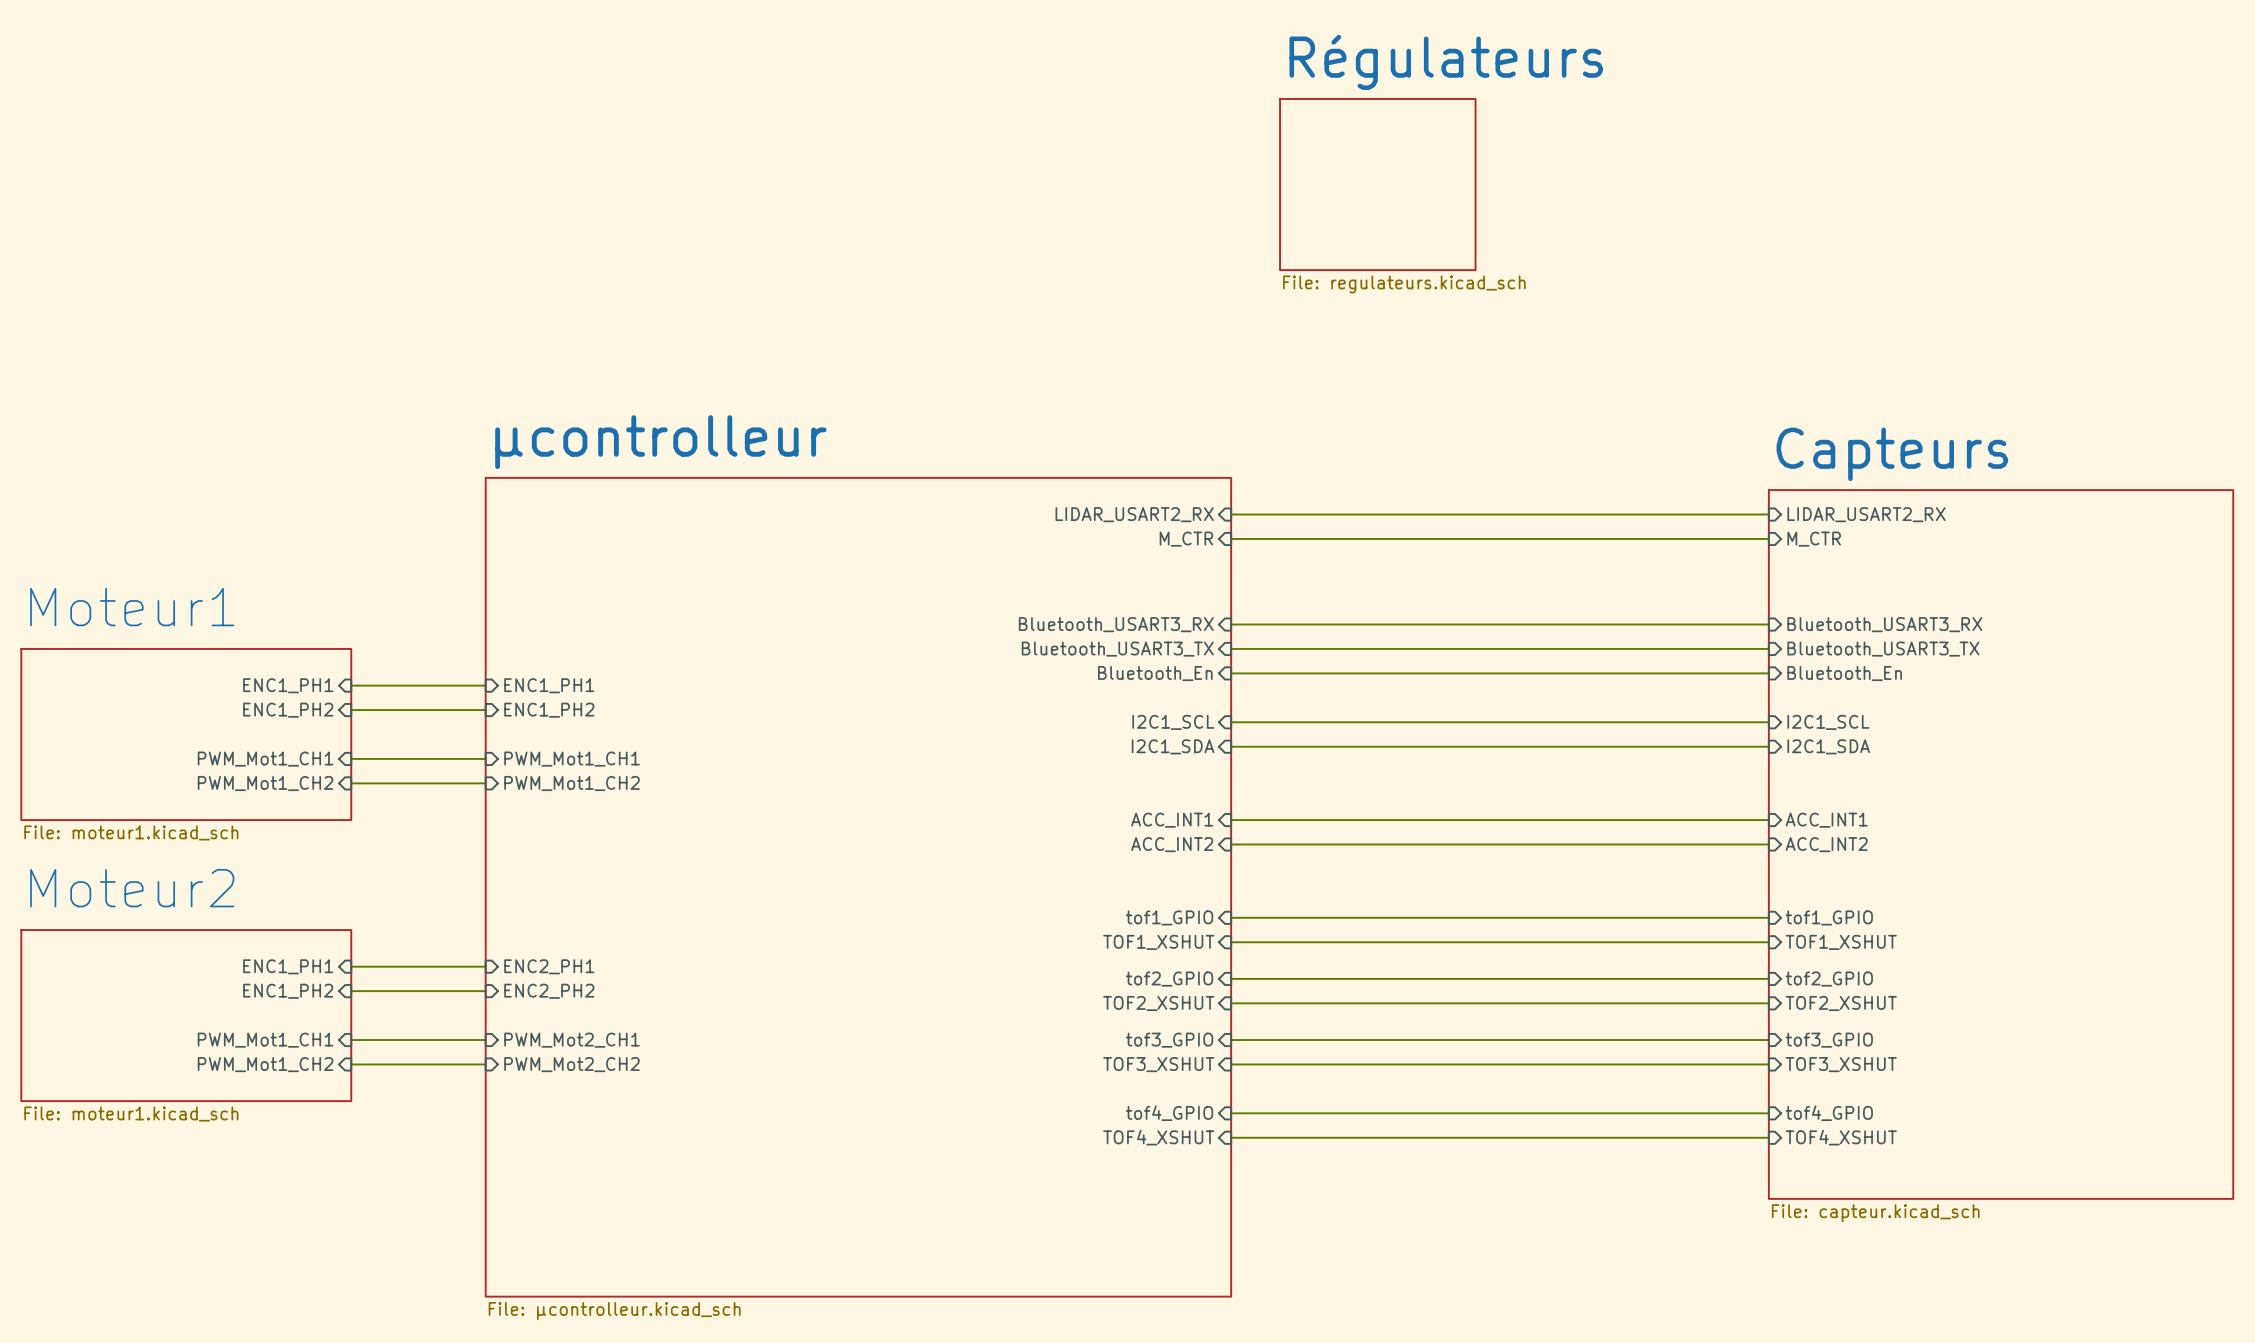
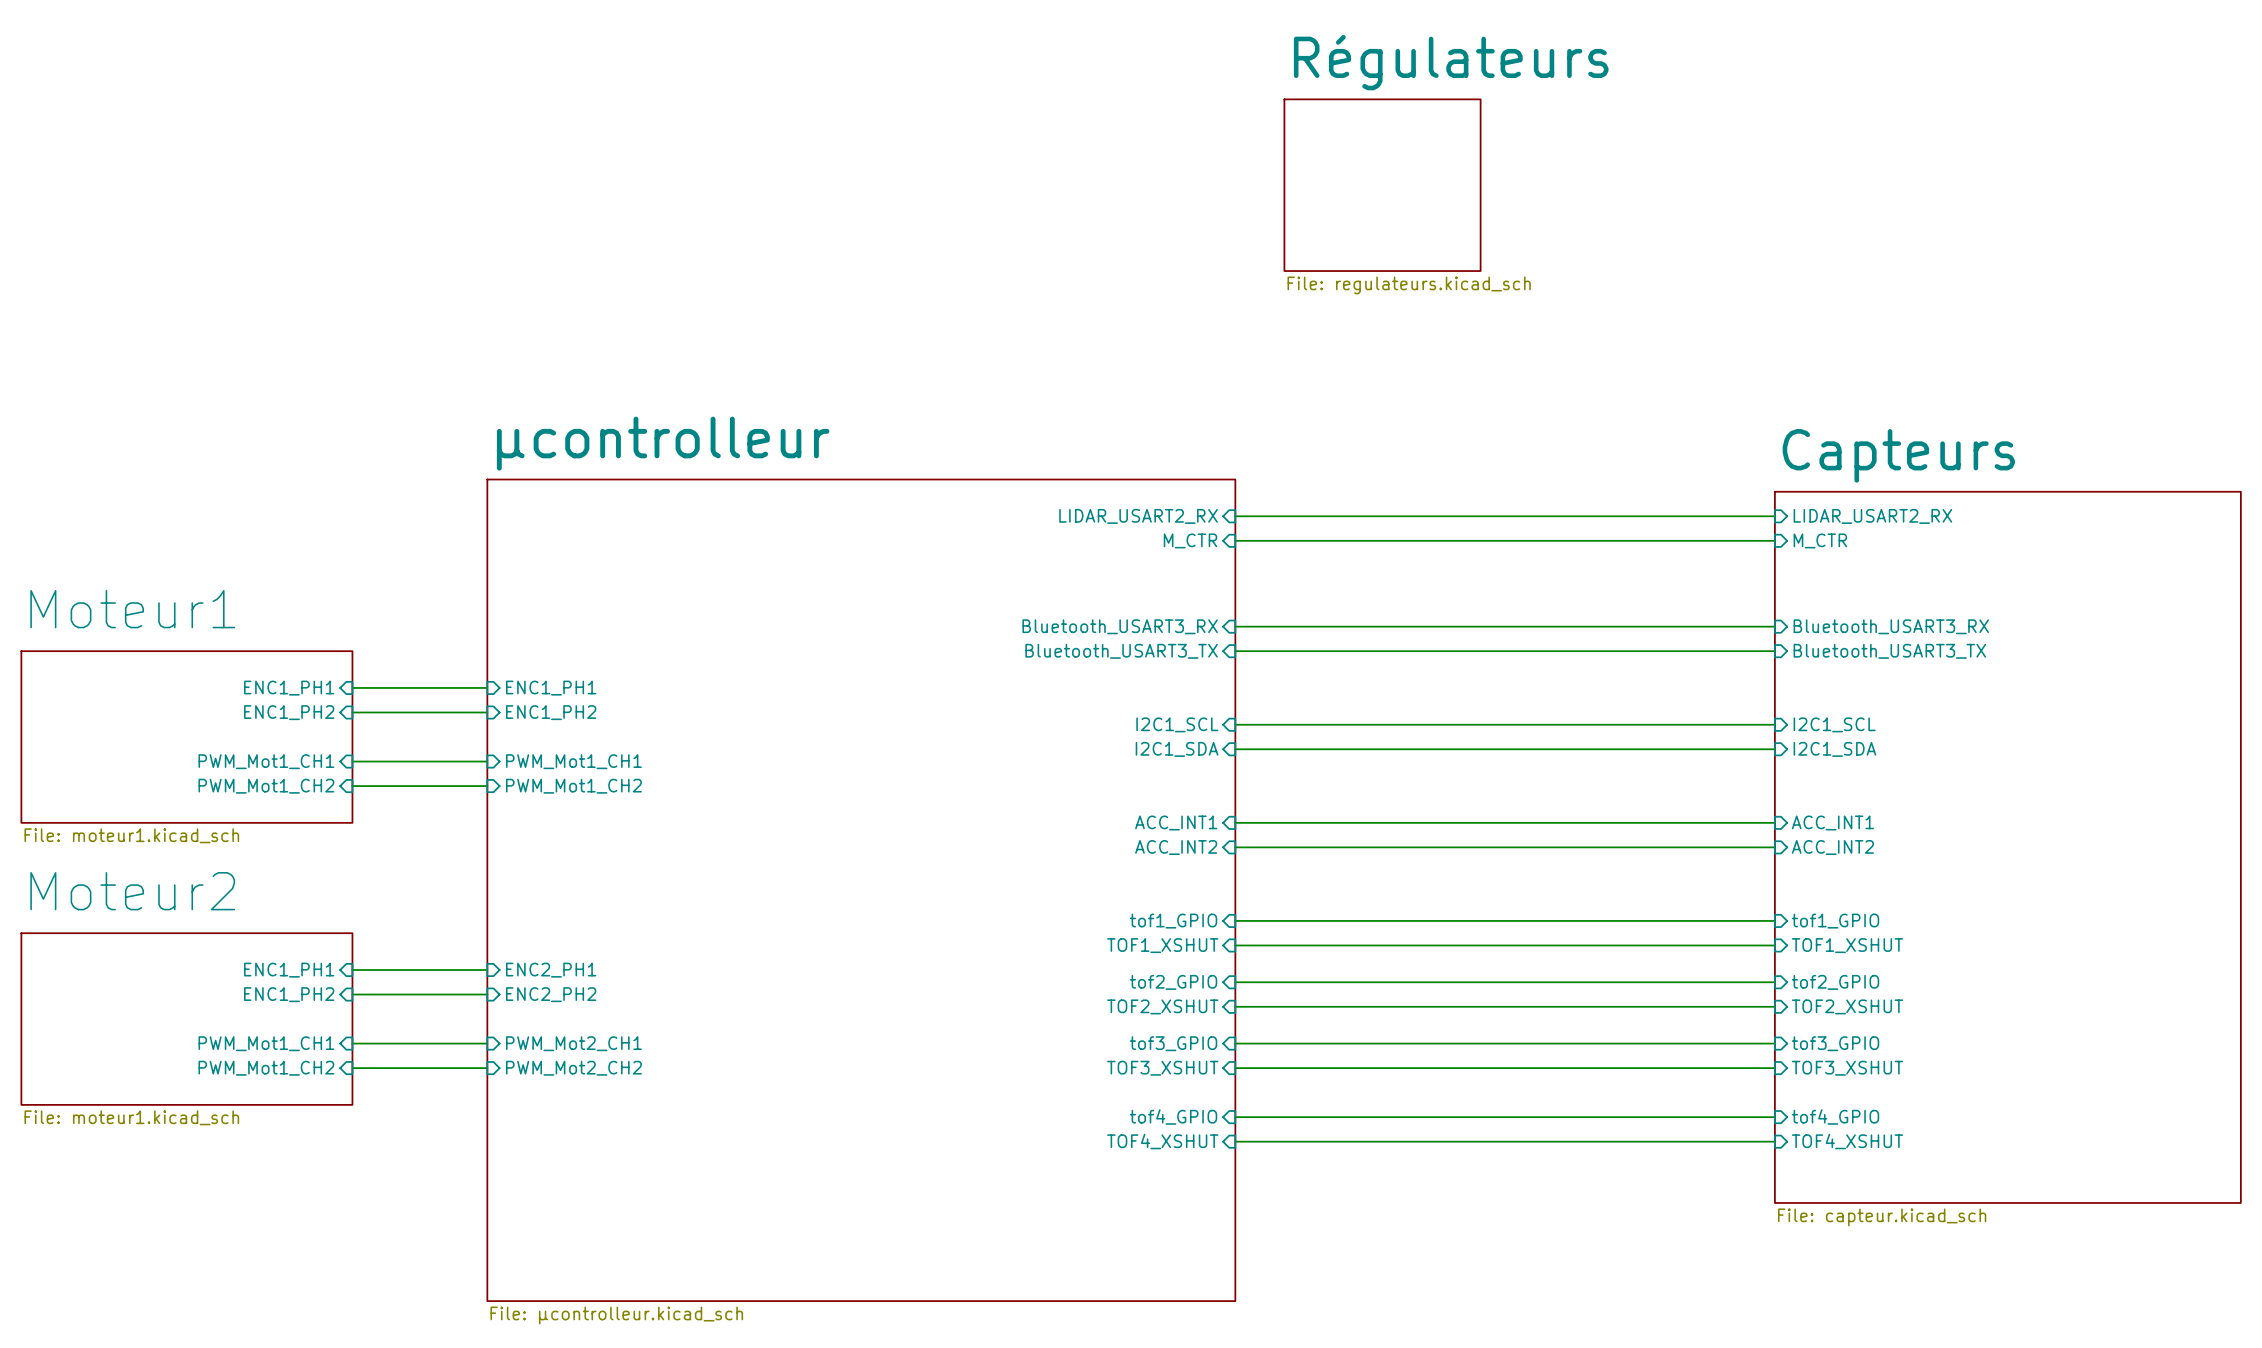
sheet pin: Bluetooth_En (1155, 673) -> none
wire: (1231, 673) (1768, 673) -> none
sheet pin: Bluetooth_En (1844, 673) -> none

